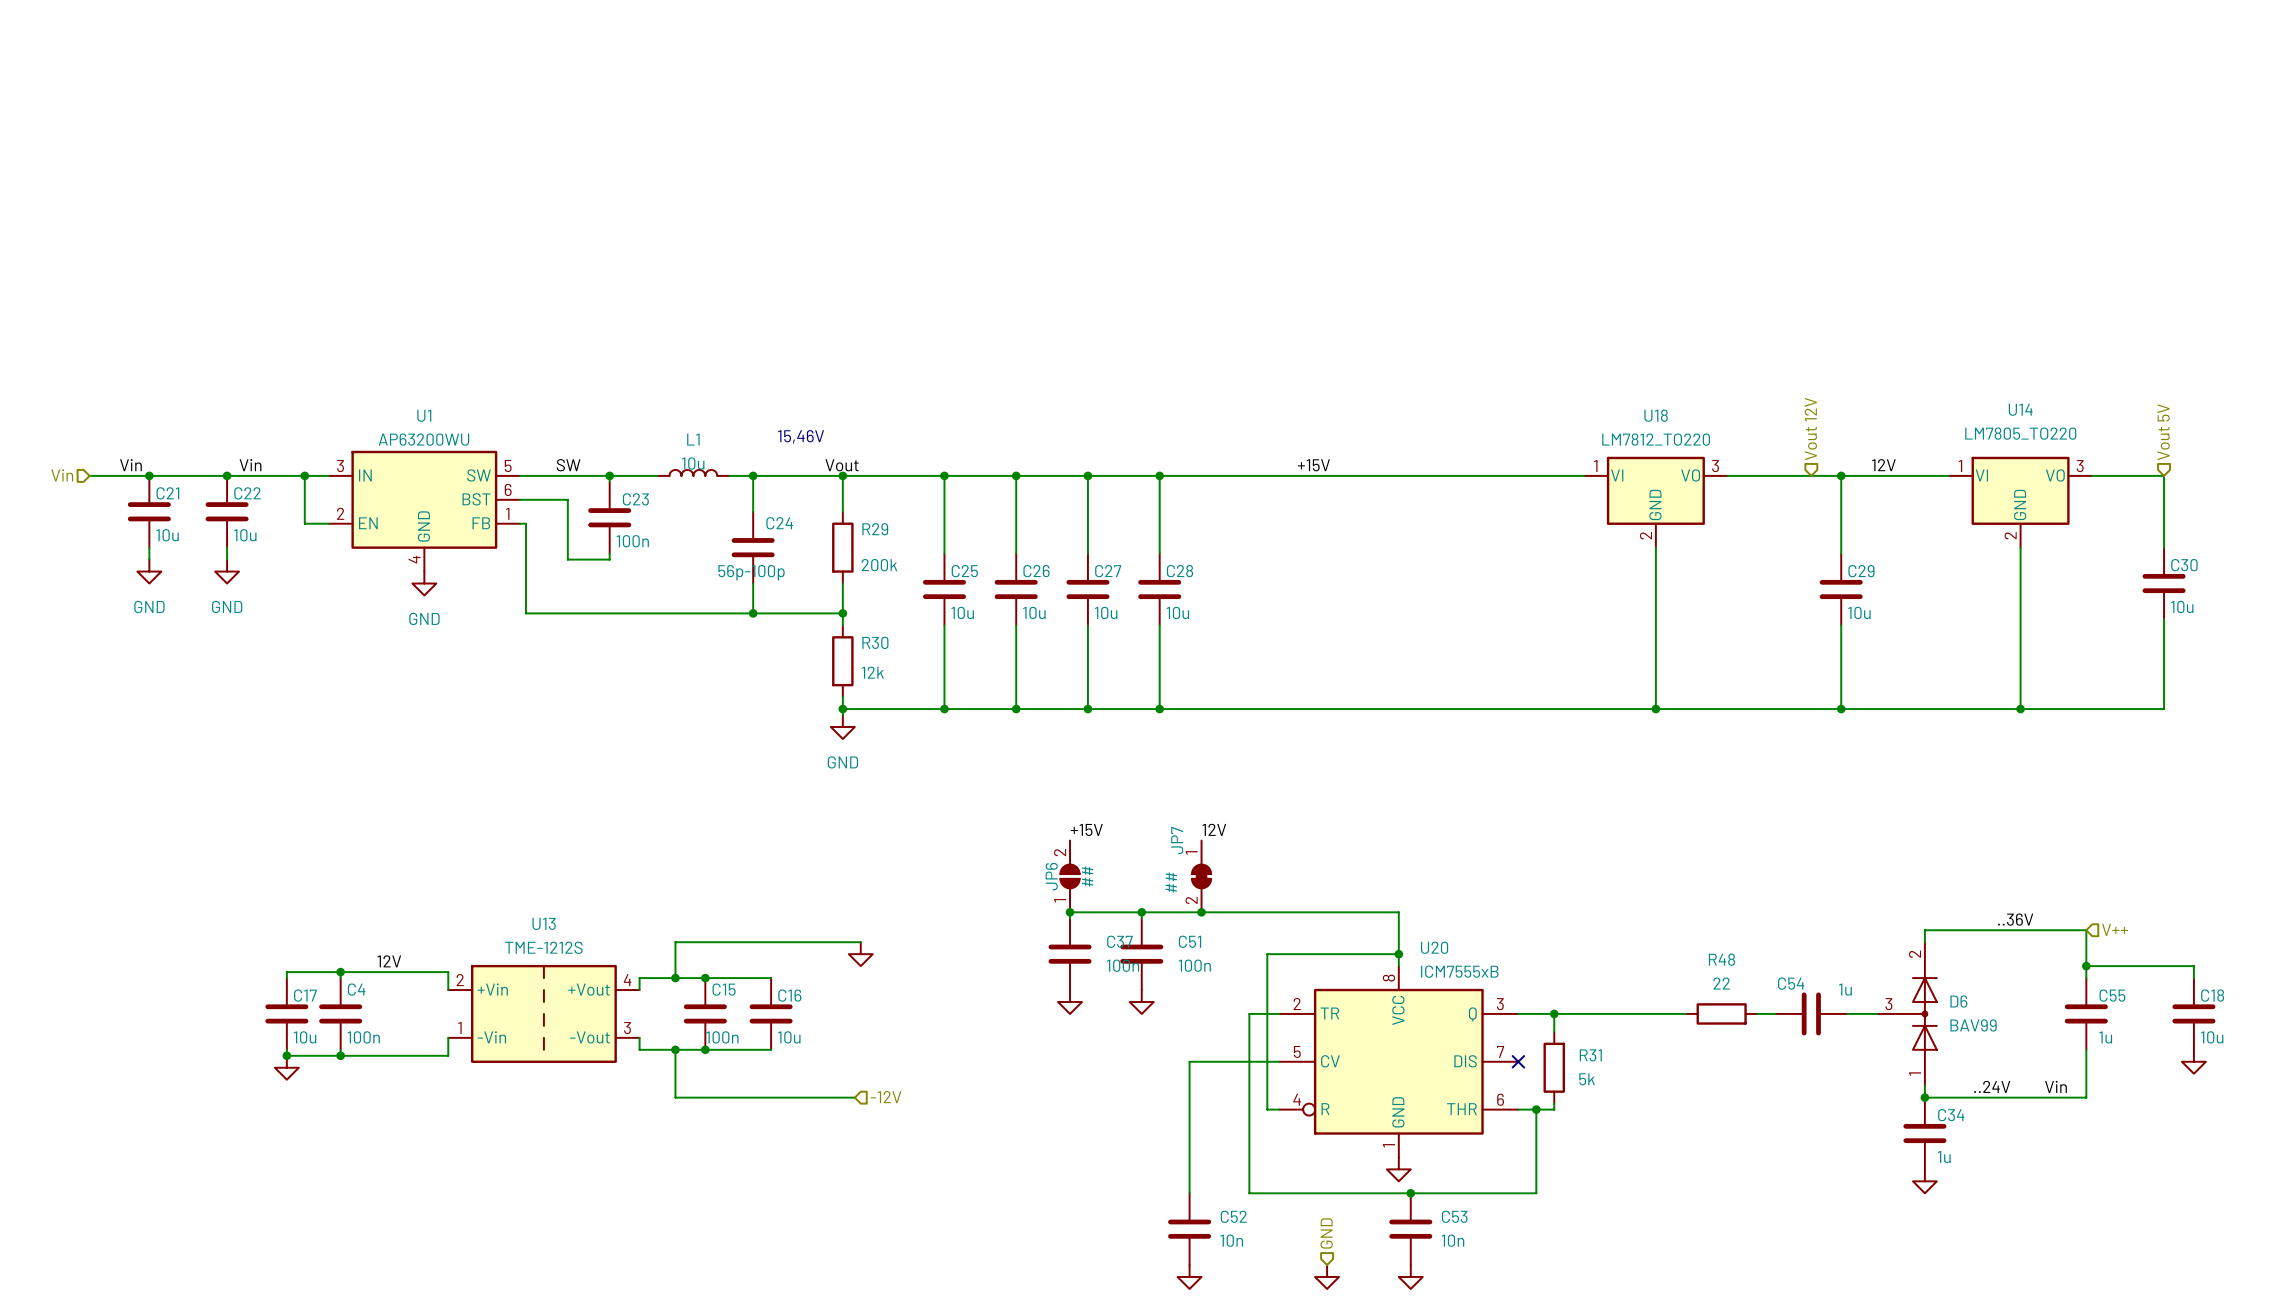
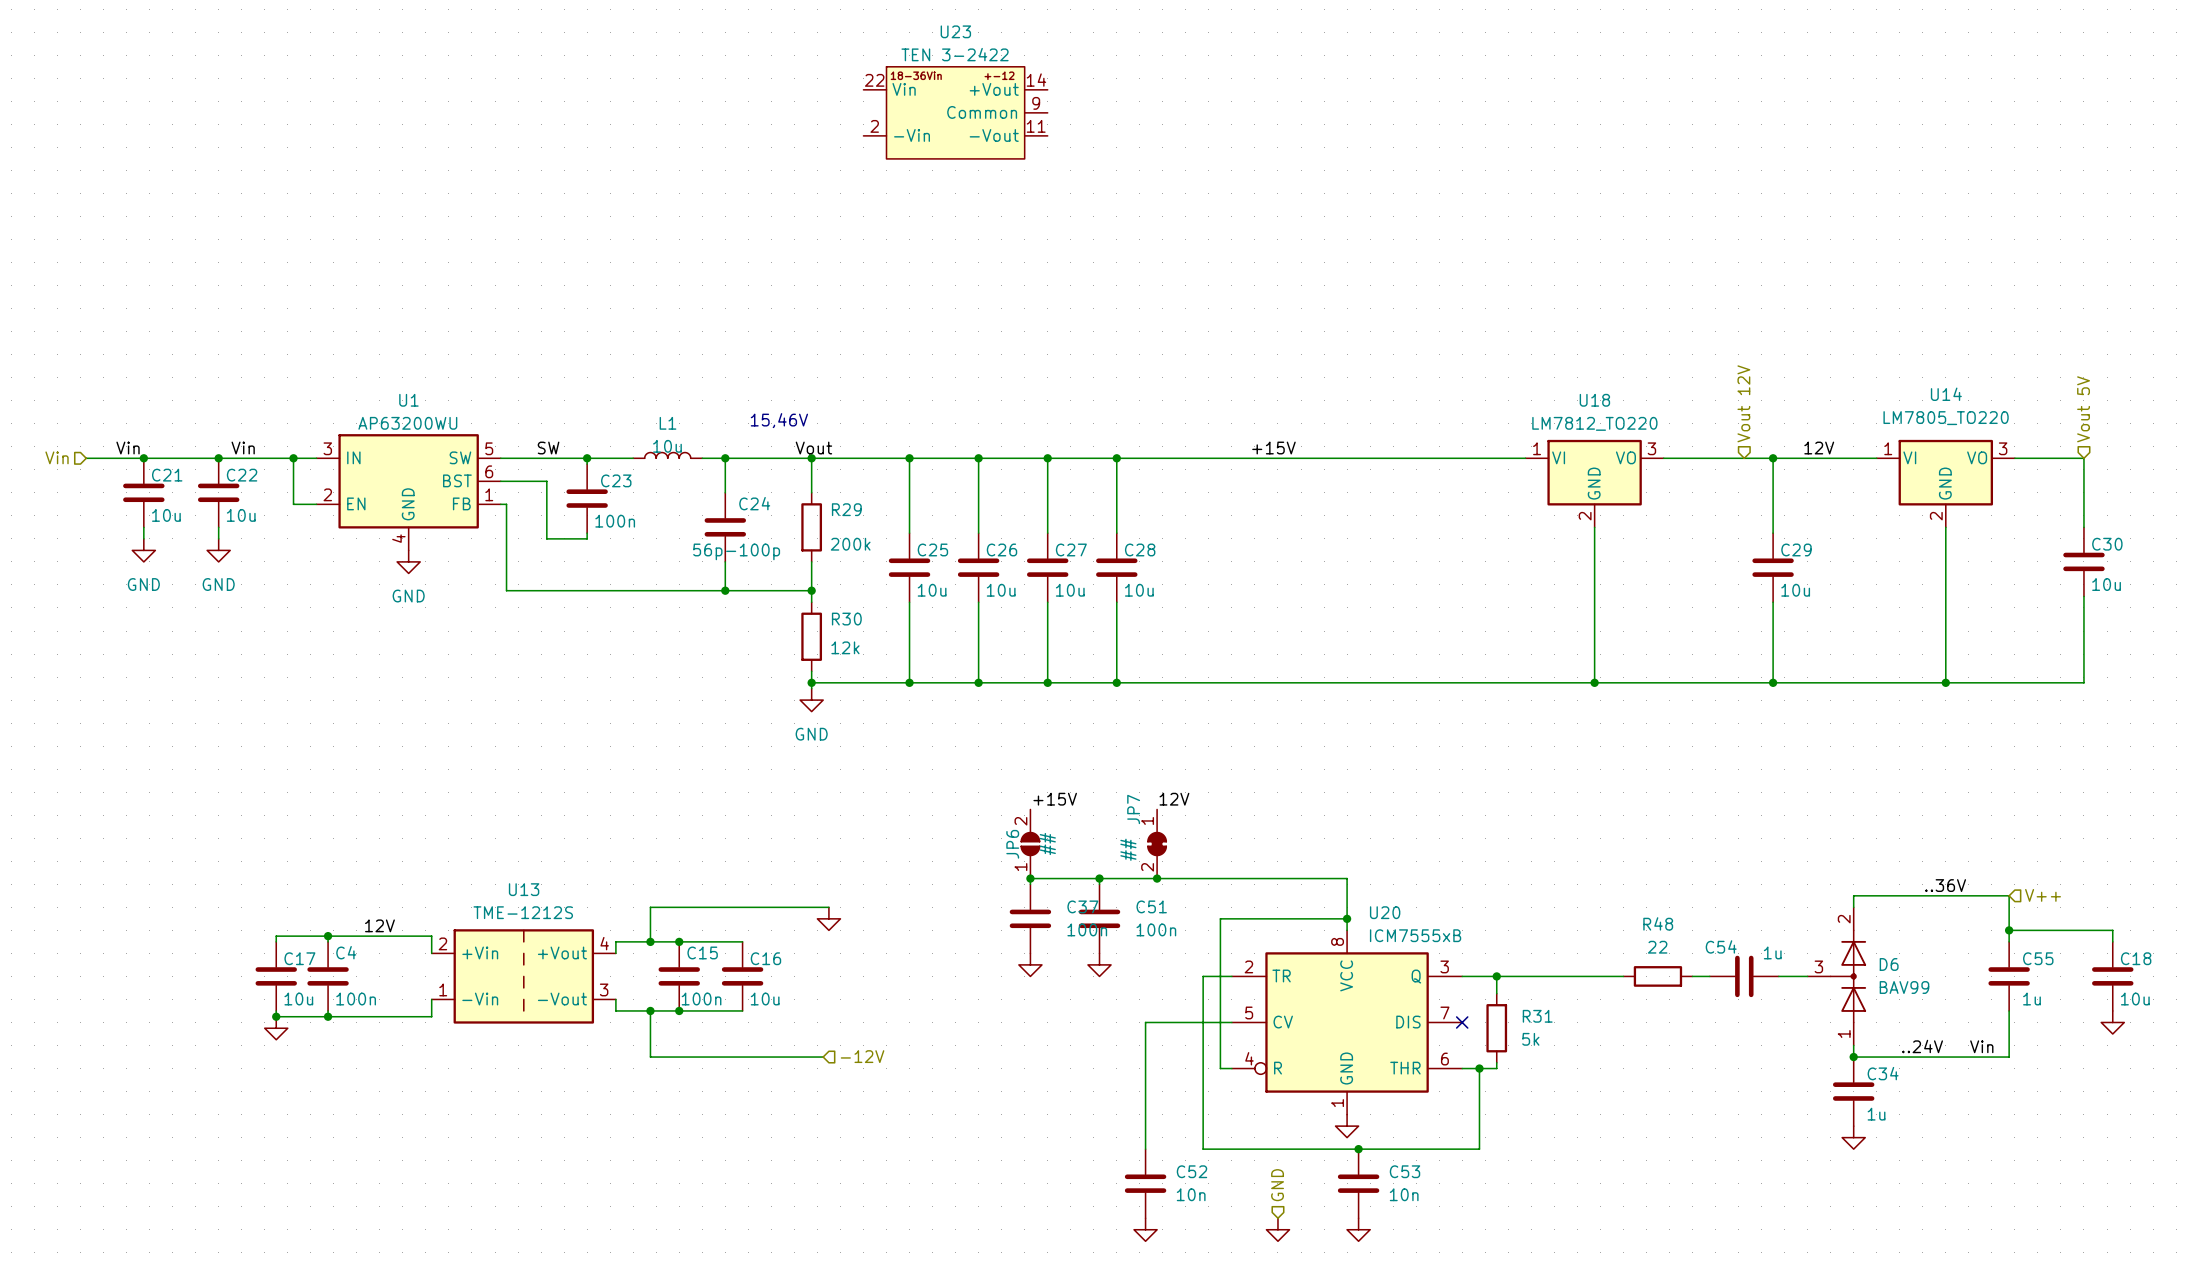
U23: none -> TEN 3-2422 (955, 112)

